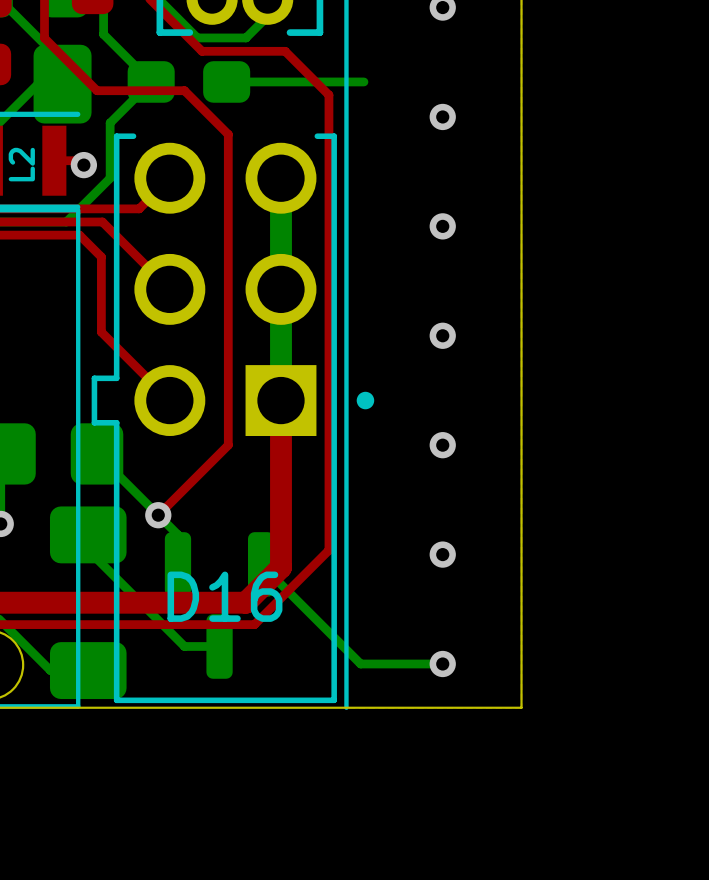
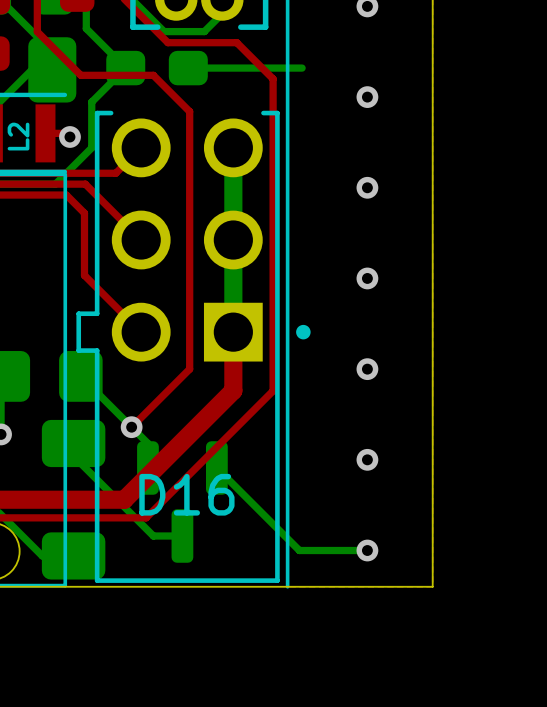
top track: (280, 471) (280, 567) (245, 602) (149, 602) -> (233, 390) (124, 499)
top track: (328, 471) (328, 550) (254, 624) (175, 624) -> (273, 390) (146, 517)

